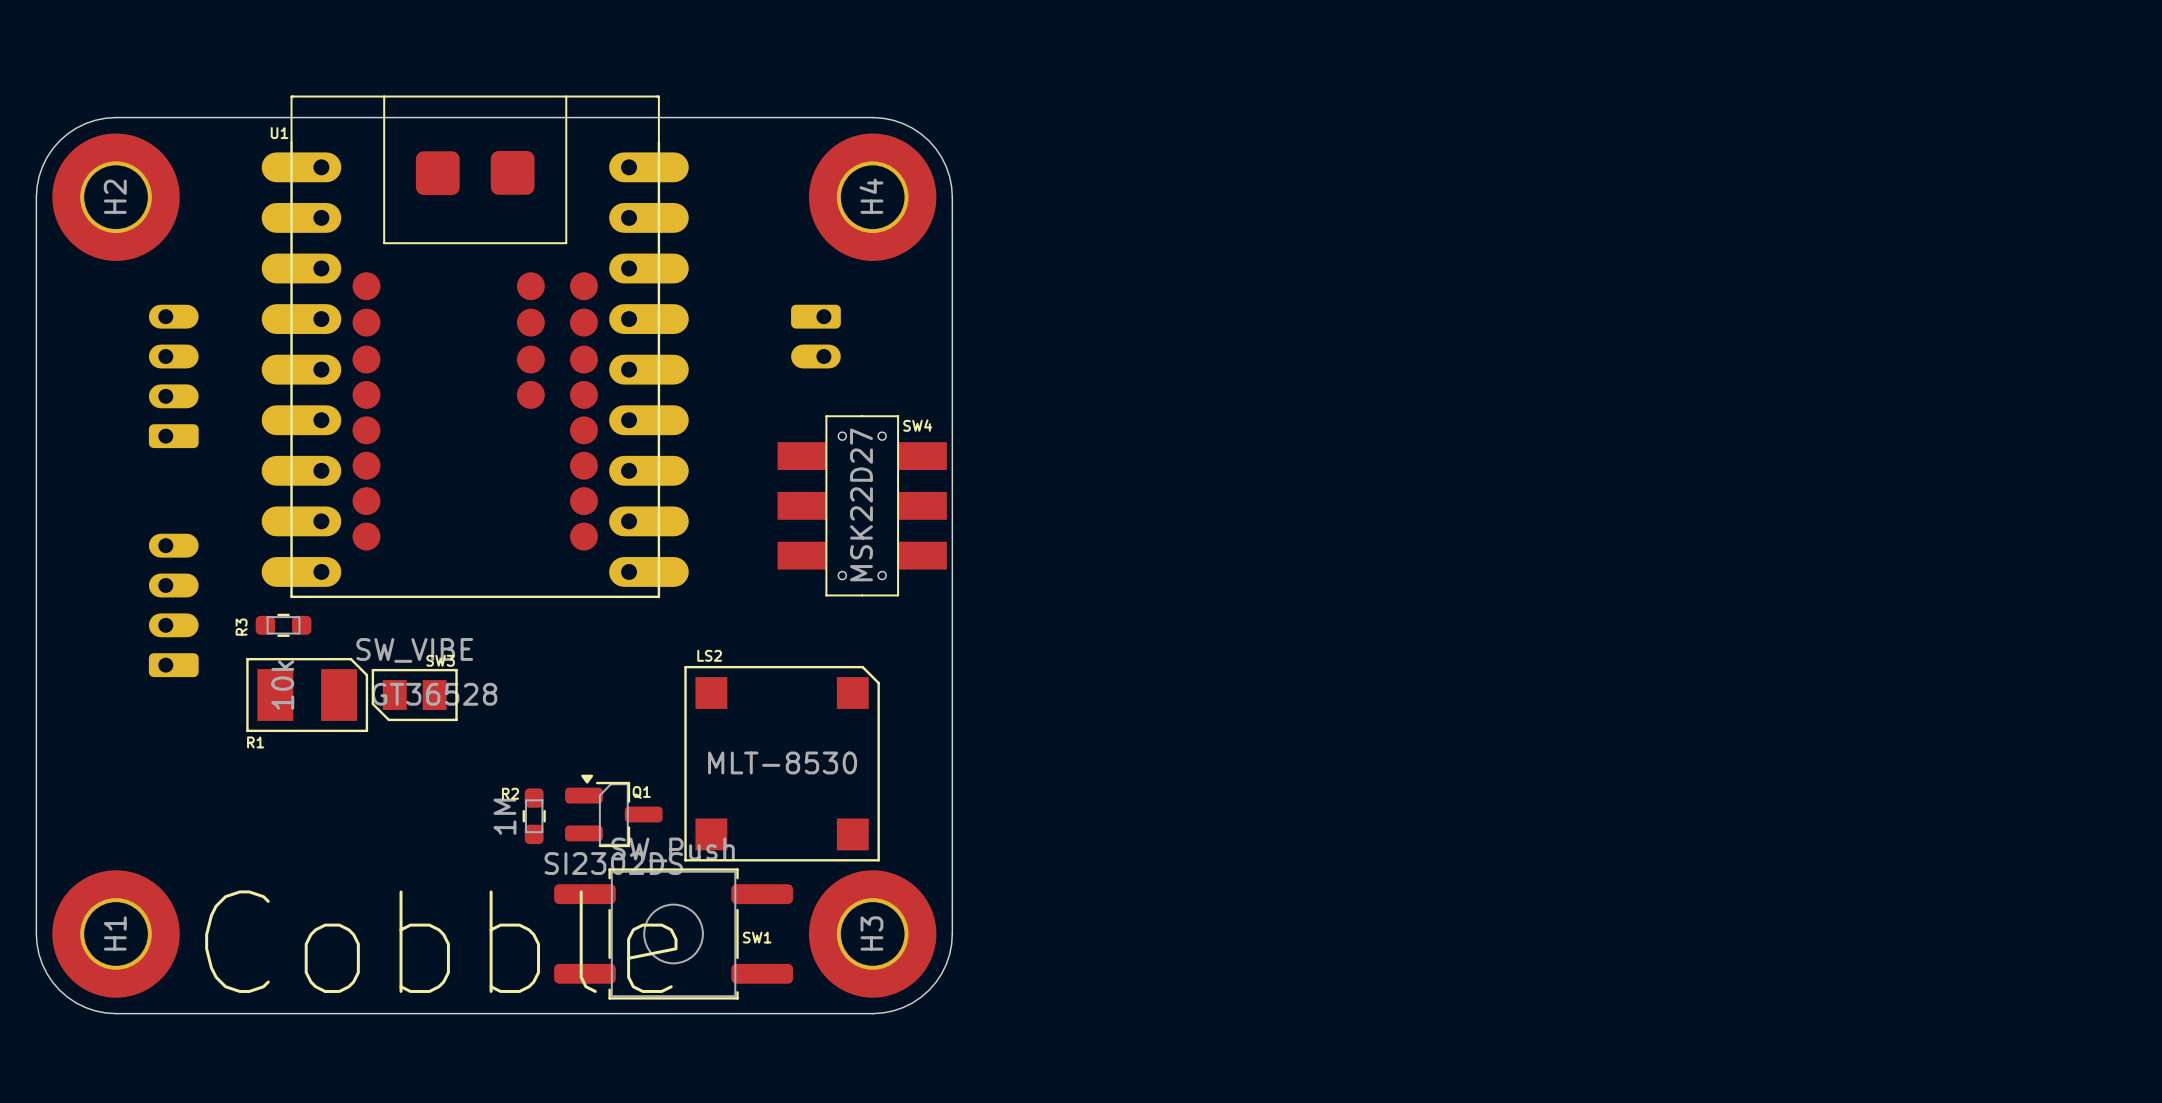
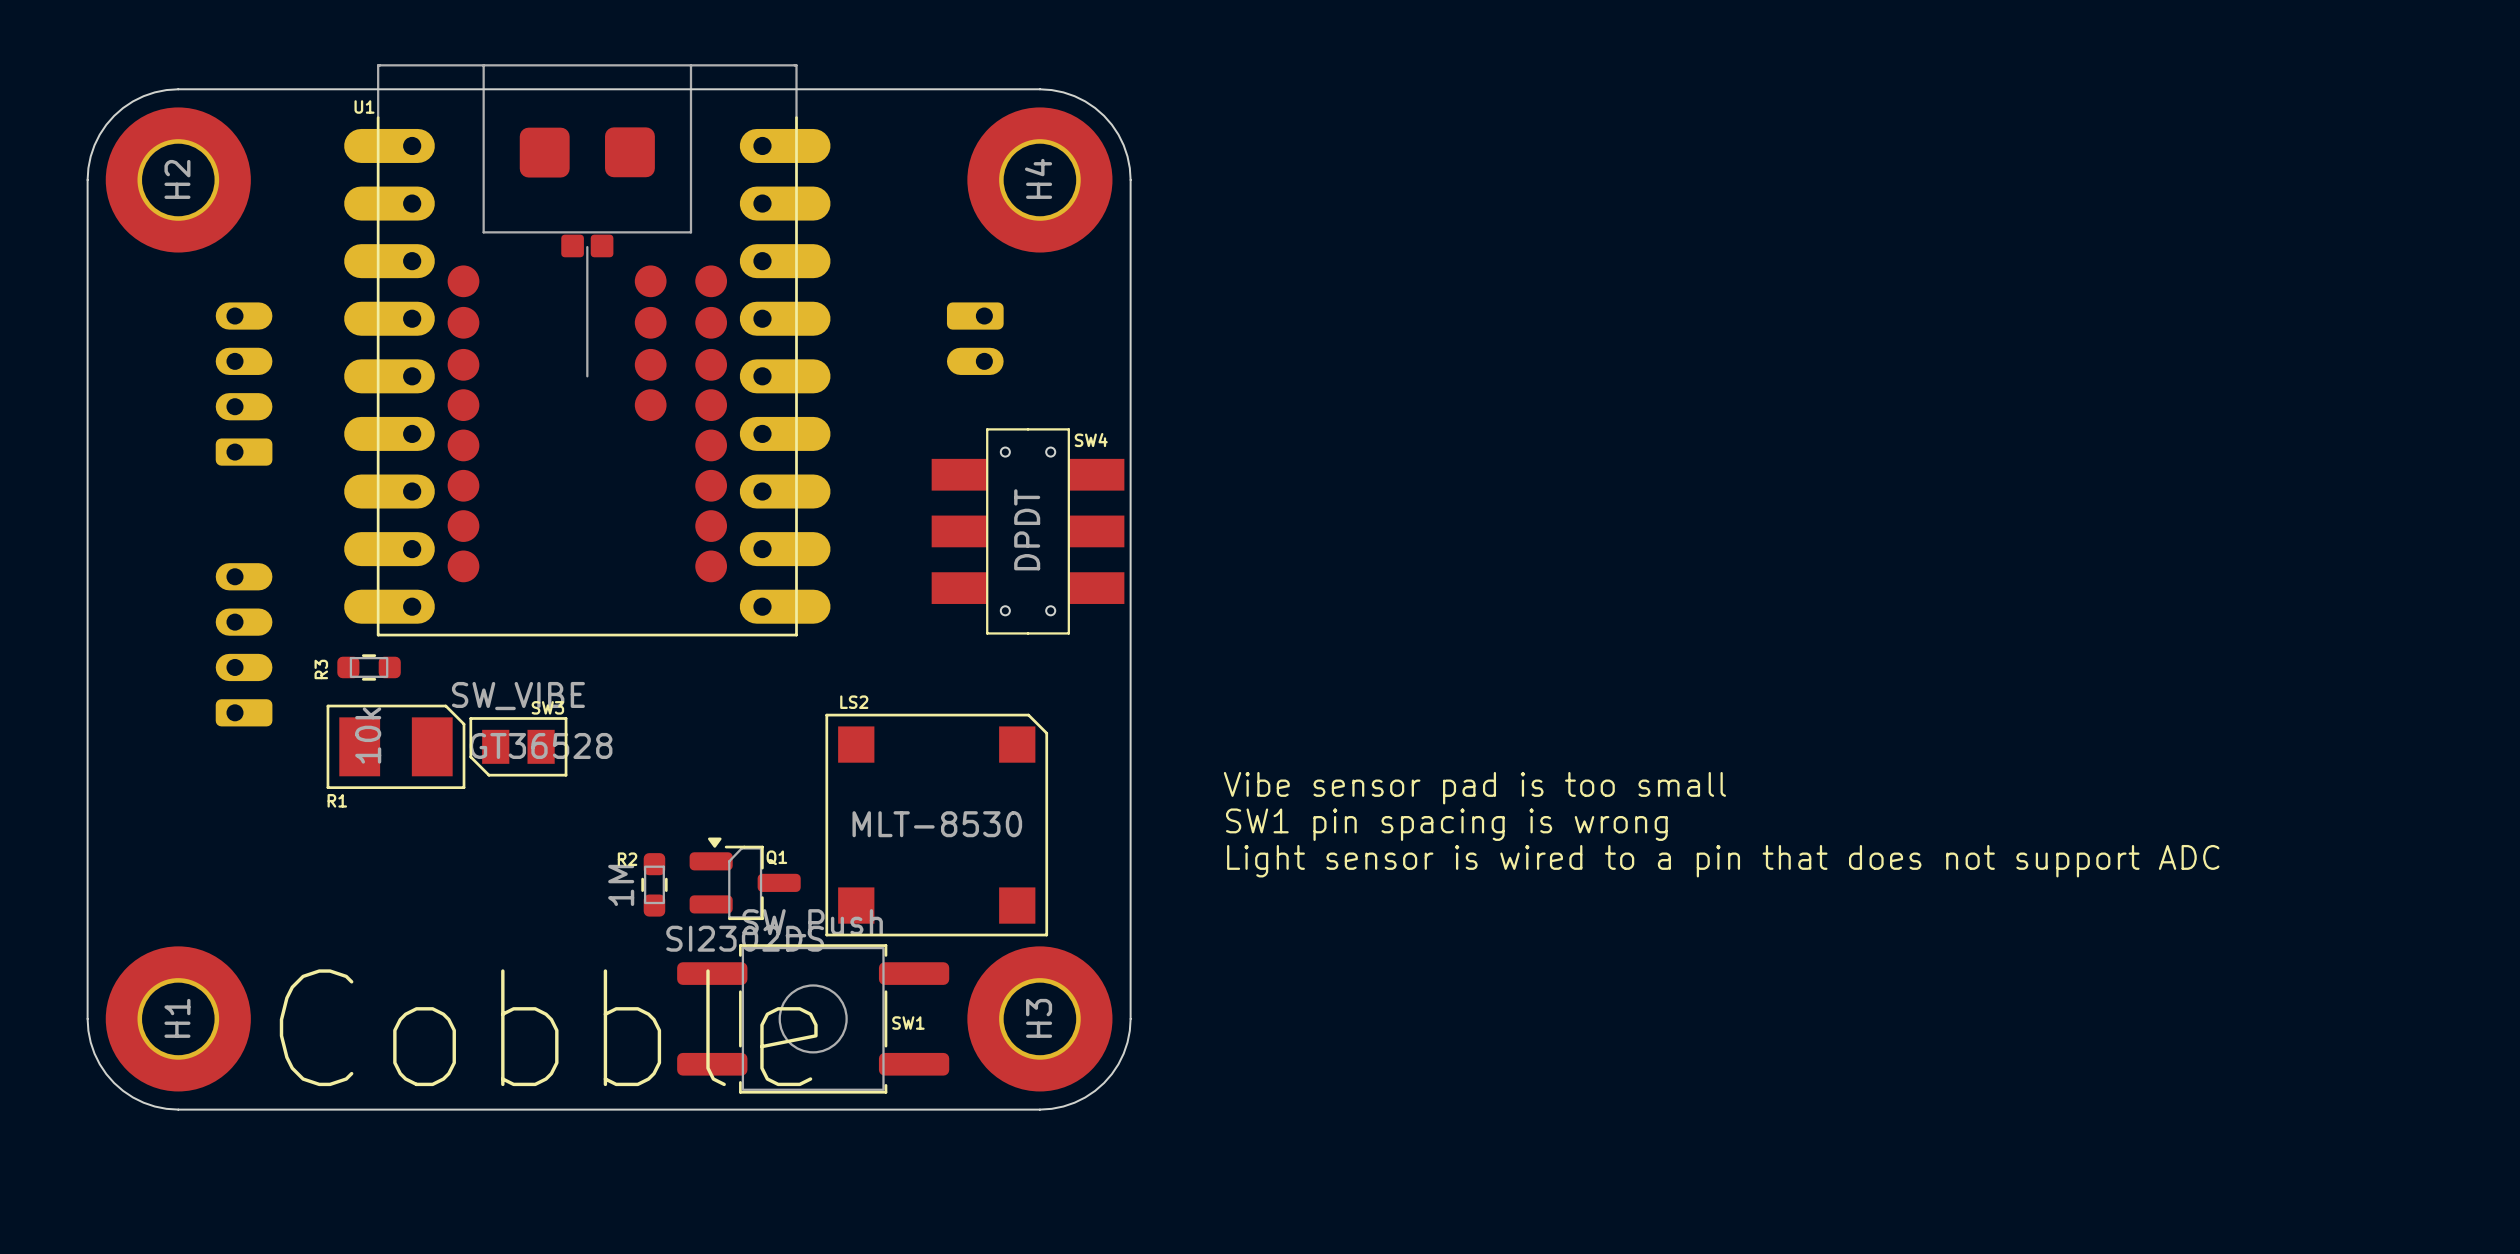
U1 footprint: [261, 95, 689, 599] -> [344, 64, 831, 637]
SW4 value: MSK22D27 (861, 504) -> DPDT (1027, 529)
text: none -> Vibe sensor pad is too small (1474, 788)
text: none -> SW1 pin spacing is wrong (1446, 824)
text: none -> Light sensor is wired to a pin that does not support ADC (1723, 861)

